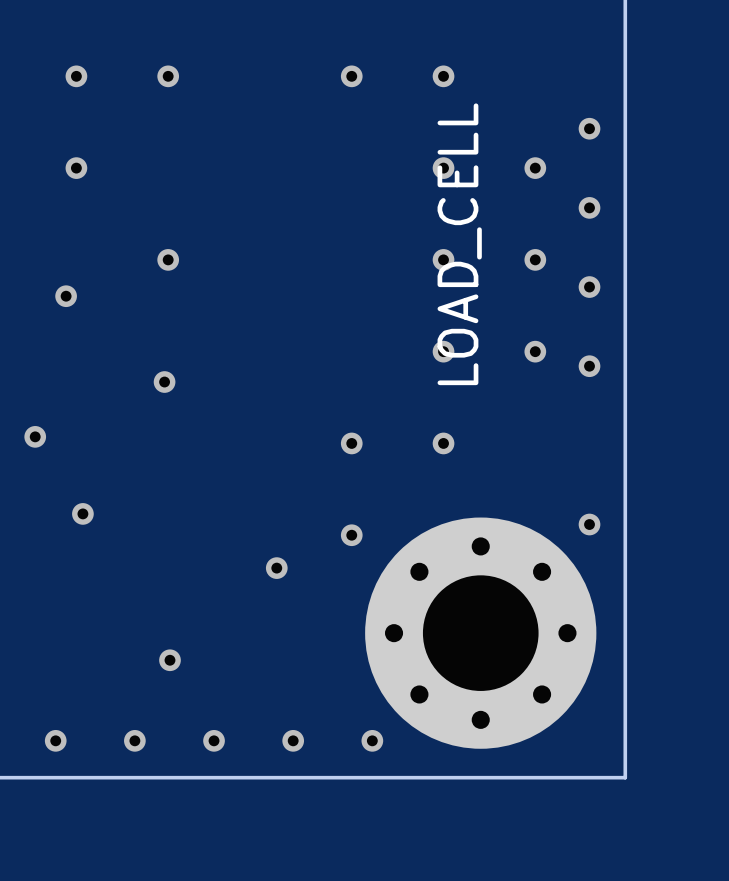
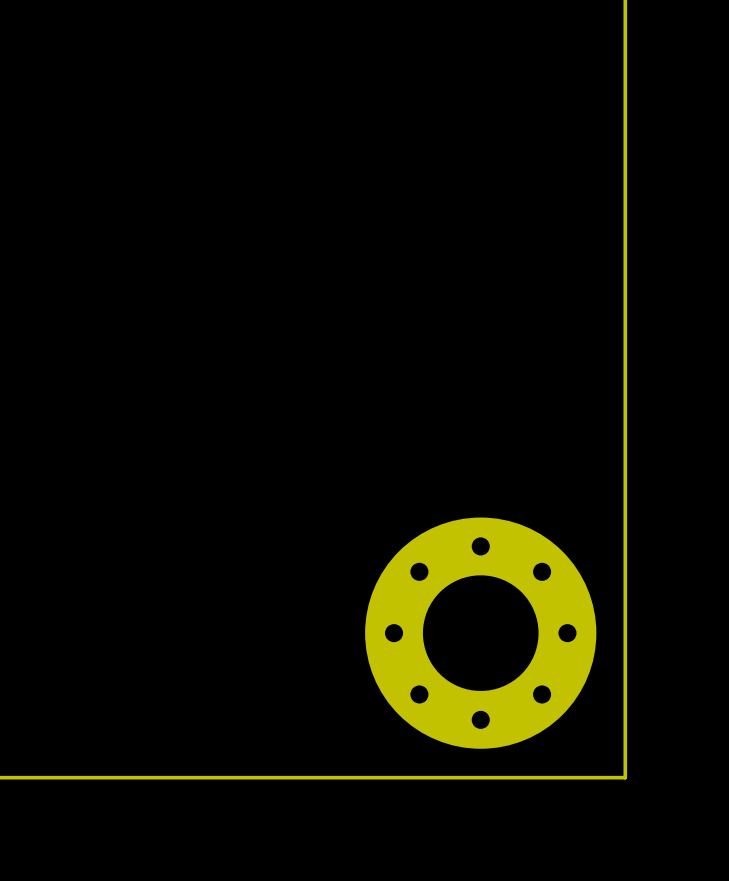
via: (76, 76) -> none
via: (168, 76) -> none
via: (351, 76) -> none
via: (443, 76) -> none
via: (589, 128) -> none
via: (76, 168) -> none
via: (443, 168) -> none
via: (535, 168) -> none
via: (589, 207) -> none
text: LOAD_CELL (459, 244) -> none
via: (168, 259) -> none
via: (443, 259) -> none
via: (535, 259) -> none
via: (589, 287) -> none
via: (66, 296) -> none
via: (443, 351) -> none
via: (535, 351) -> none
via: (589, 366) -> none
via: (164, 382) -> none
via: (35, 436) -> none
via: (351, 443) -> none
via: (443, 443) -> none
via: (82, 513) -> none
via: (589, 524) -> none
via: (351, 535) -> none
via: (276, 568) -> none
via: (169, 660) -> none
via: (55, 740) -> none
via: (134, 740) -> none
via: (214, 740) -> none
via: (293, 740) -> none
via: (372, 740) -> none

